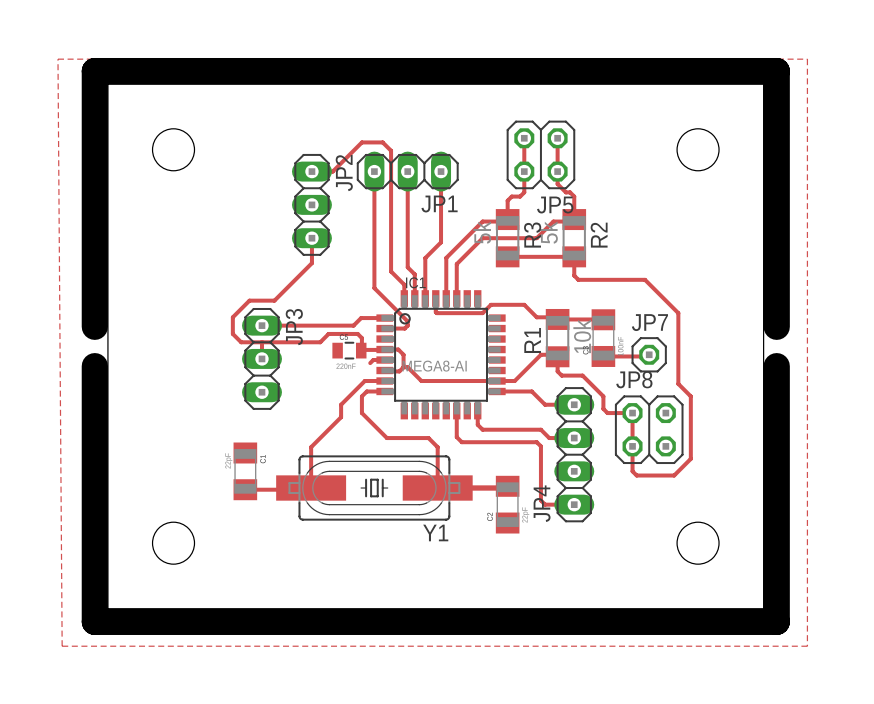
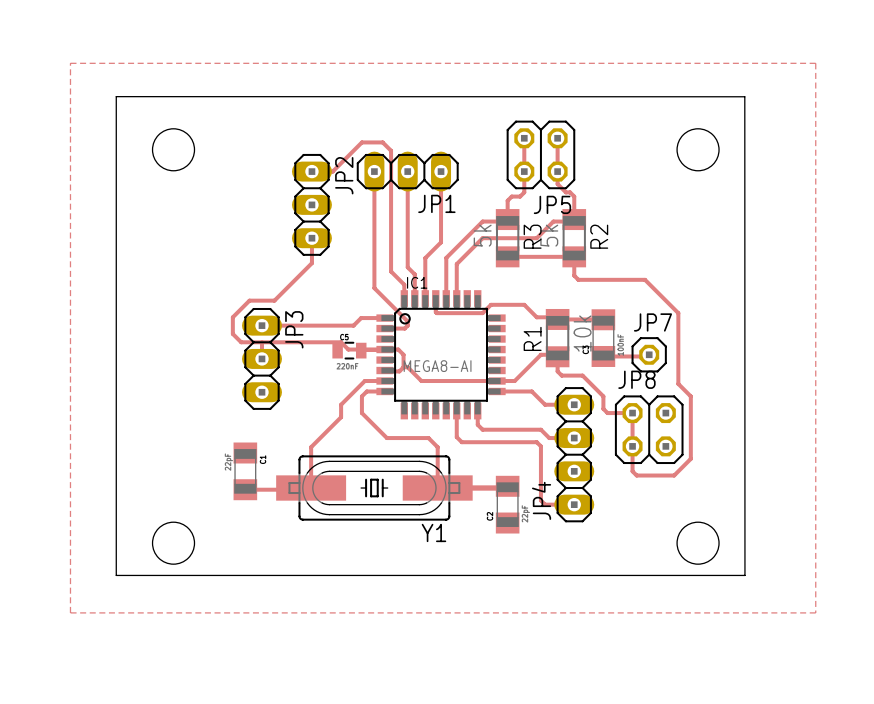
zone outline: (57, 59) (62, 646) (807, 646) (807, 59) (57, 59) -> (70, 63) (70, 612) (815, 612) (815, 63) (70, 63)
board edge: (107, 84) (763, 84) (763, 608) (107, 608) (107, 84) -> (116, 96) (116, 575) (744, 575) (744, 96) (116, 96)
board edge: (94, 326) (94, 71) (776, 71) (776, 326) -> none
track: (320, 342) (328, 333) (357, 333) (361, 338) (361, 349) -> (320, 342) (341, 342) (348, 349) (384, 349)
track: (384, 360) (373, 360) (370, 363) -> none
board edge: (94, 366) (94, 621) (776, 621) (776, 366) -> none

